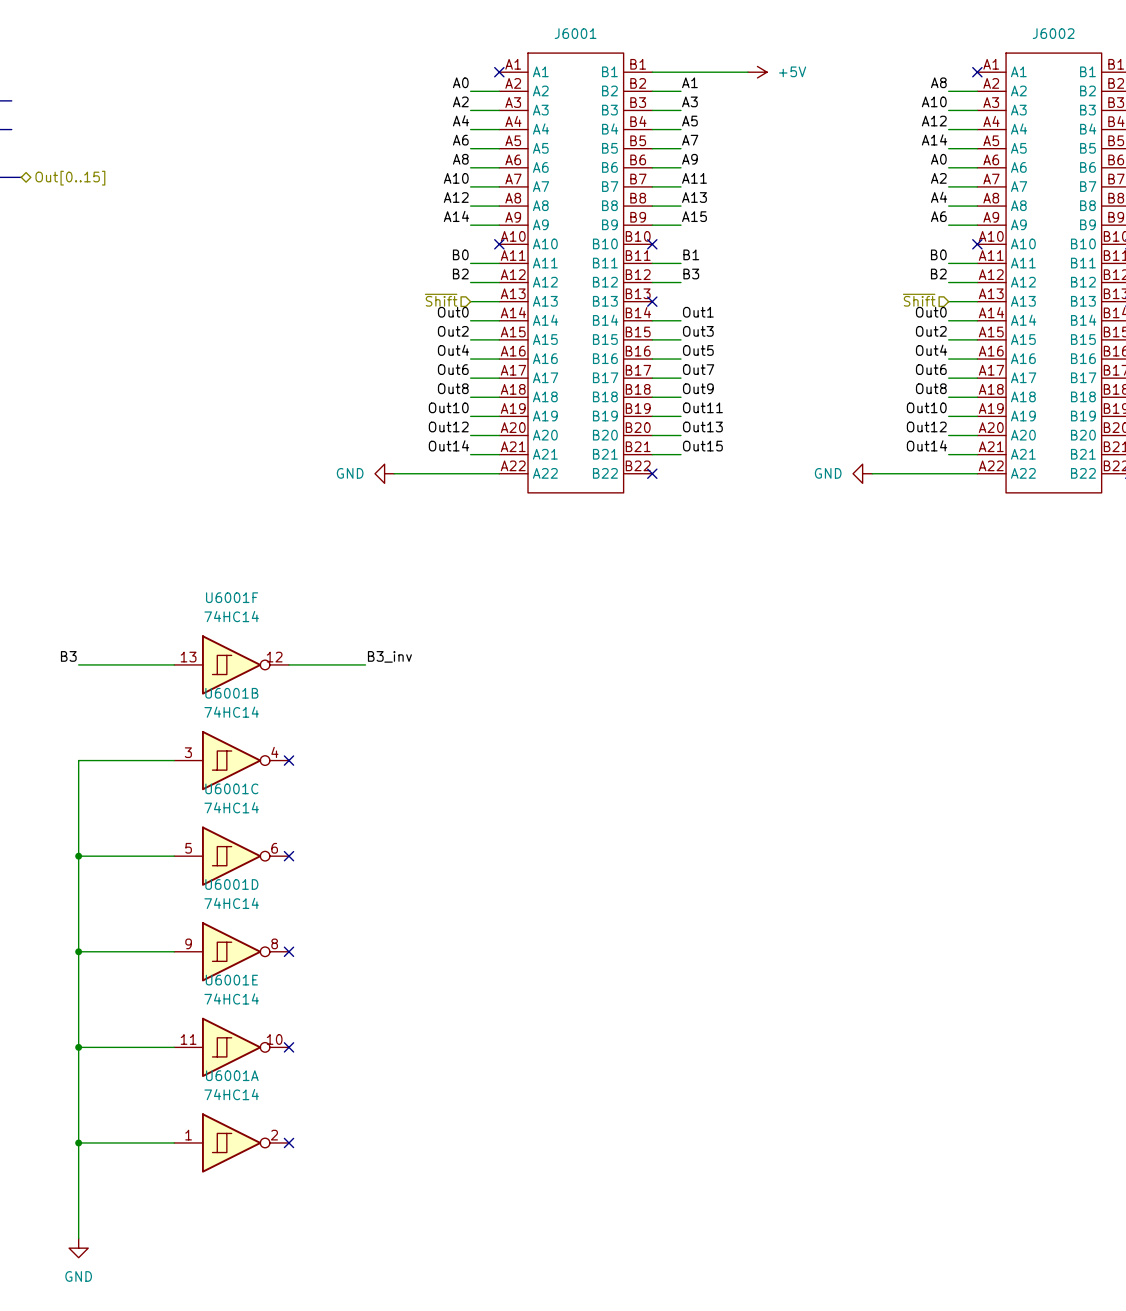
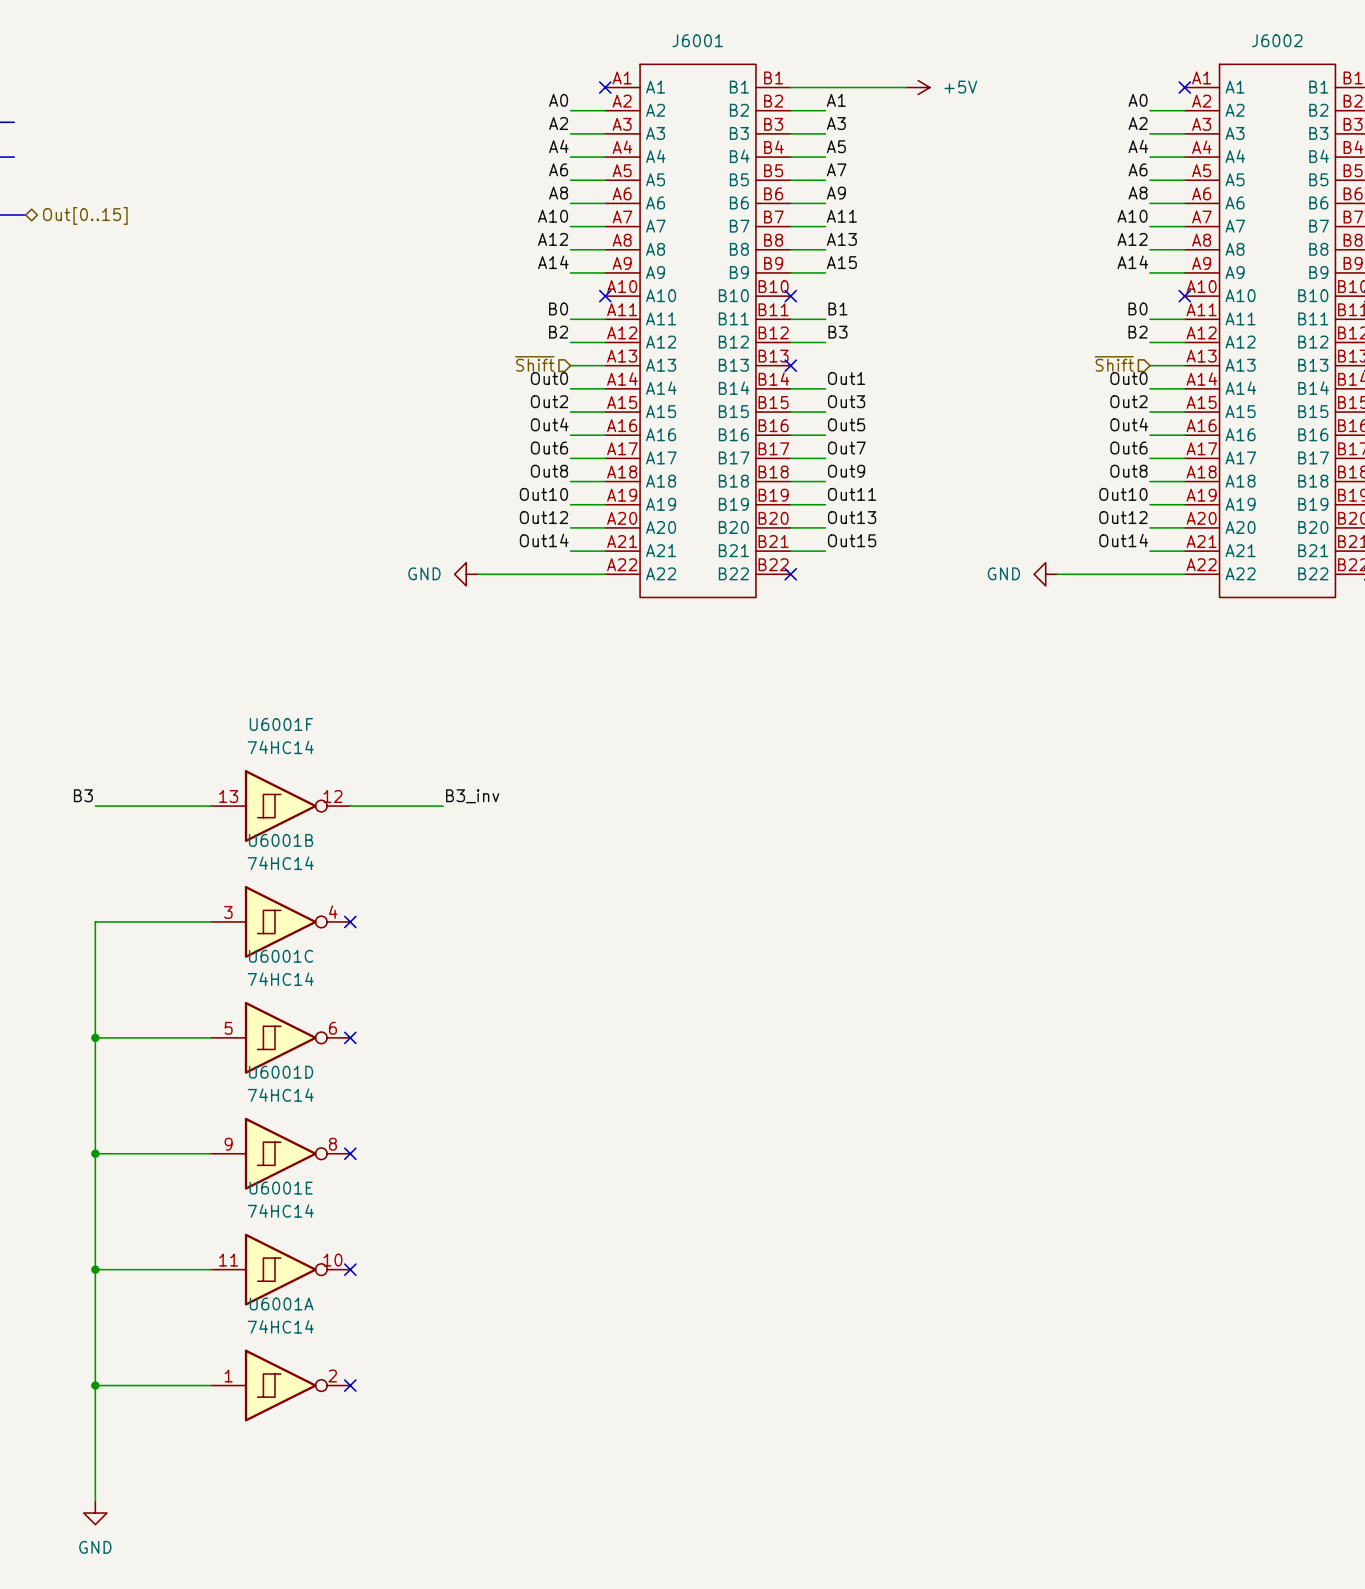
label: A8 (938, 82) -> A0 (1138, 100)
label: A10 (934, 101) -> A2 (1138, 123)
label: A12 (934, 121) -> A4 (1138, 146)
label: A14 (934, 139) -> A6 (1138, 169)
label: A0 (938, 159) -> A8 (1138, 193)
label: A2 (938, 178) -> A10 (1132, 216)
label: A4 (939, 197) -> A12 (1132, 239)
label: A6 (938, 216) -> A14 (1132, 262)

